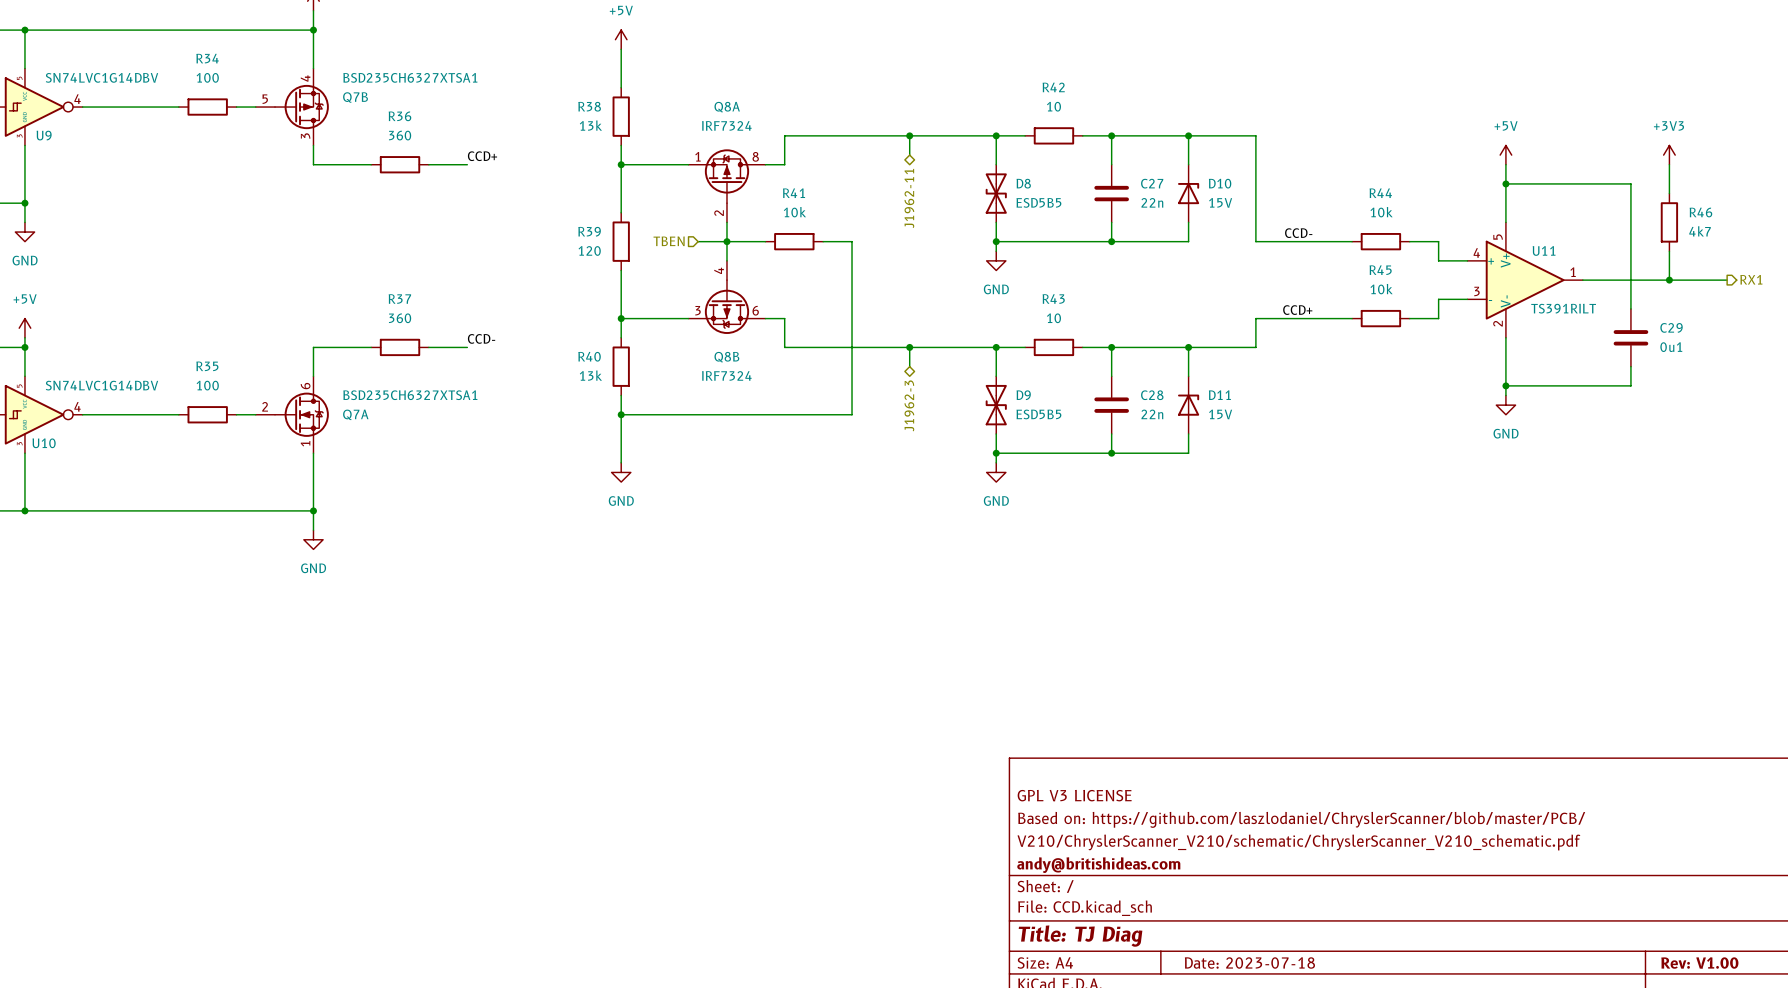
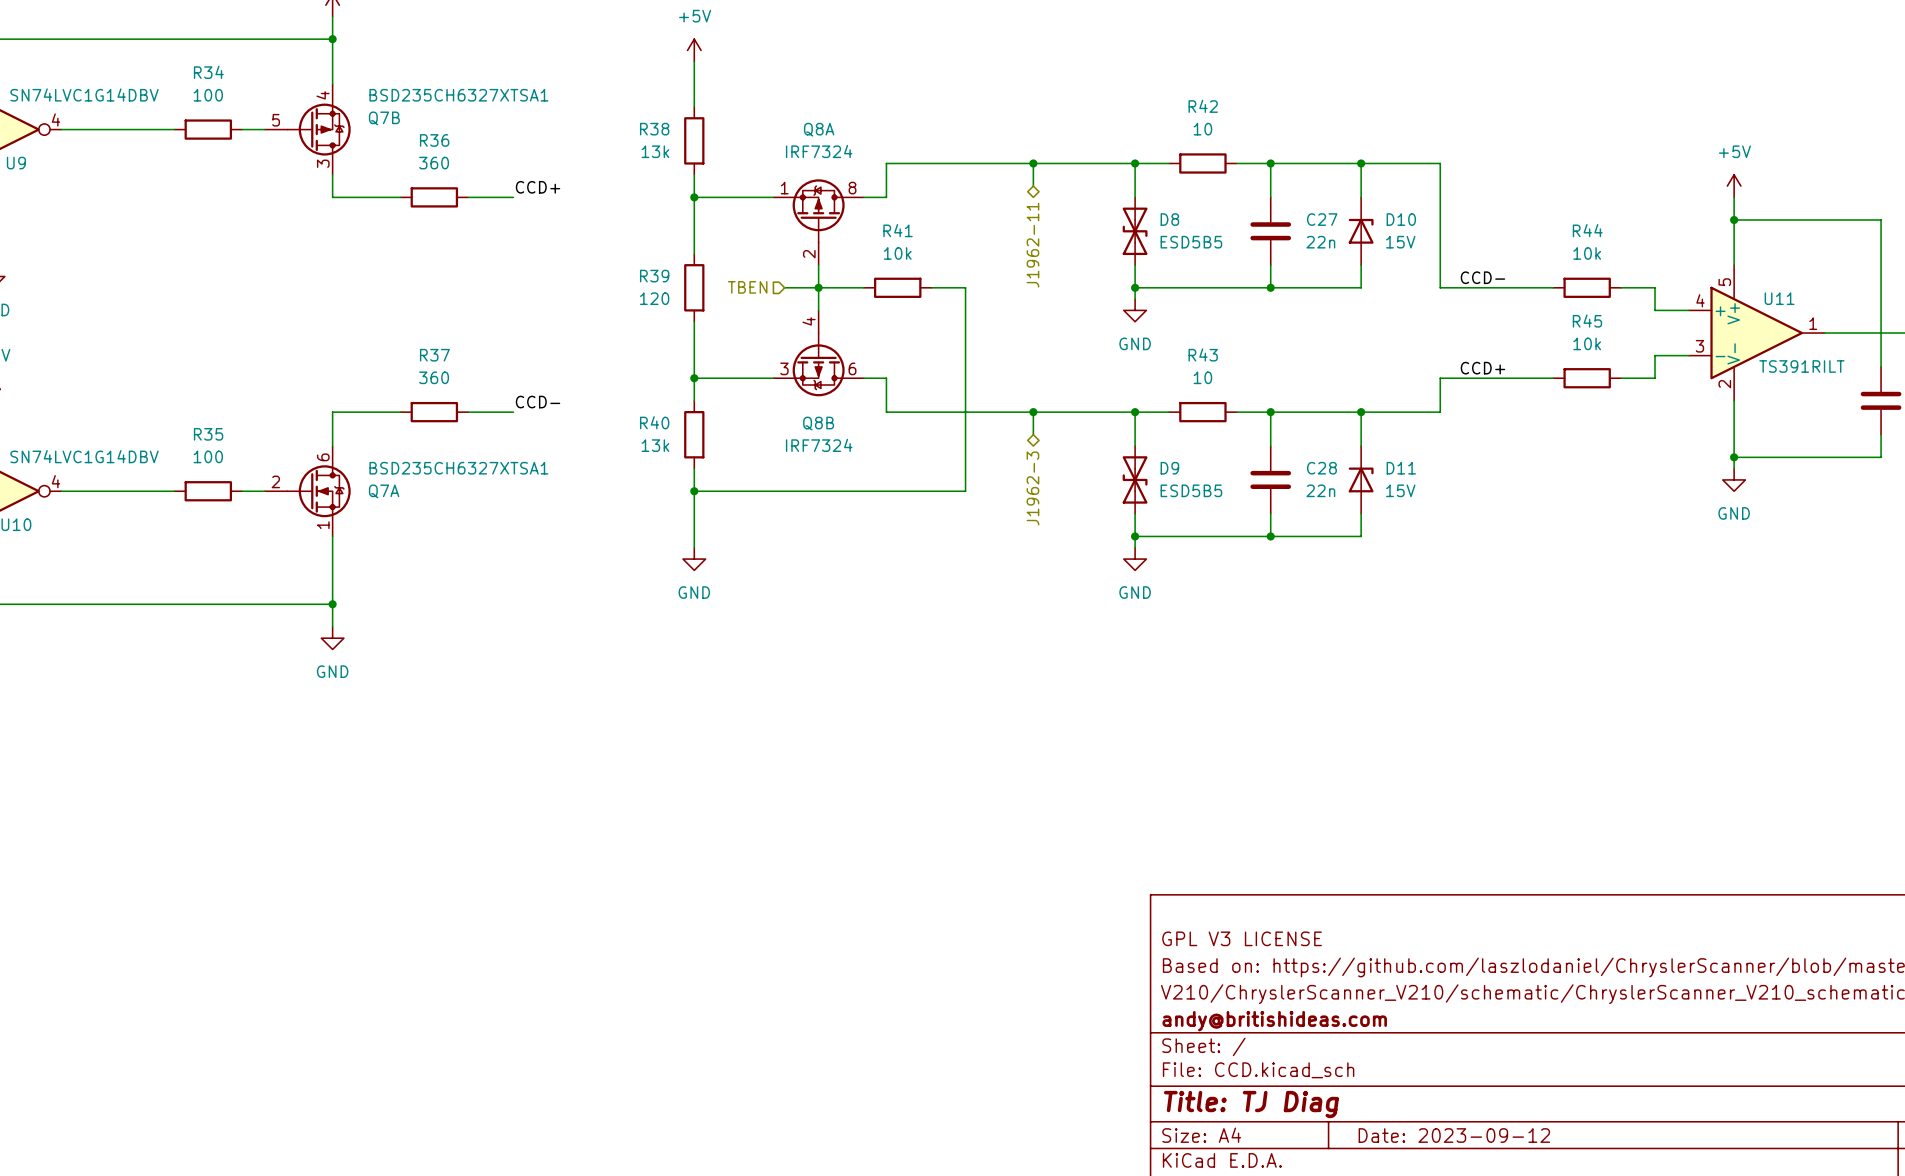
title block: Date: 2023-07-18 (1249, 962) -> Date: 2023-09-12 (1454, 1135)

